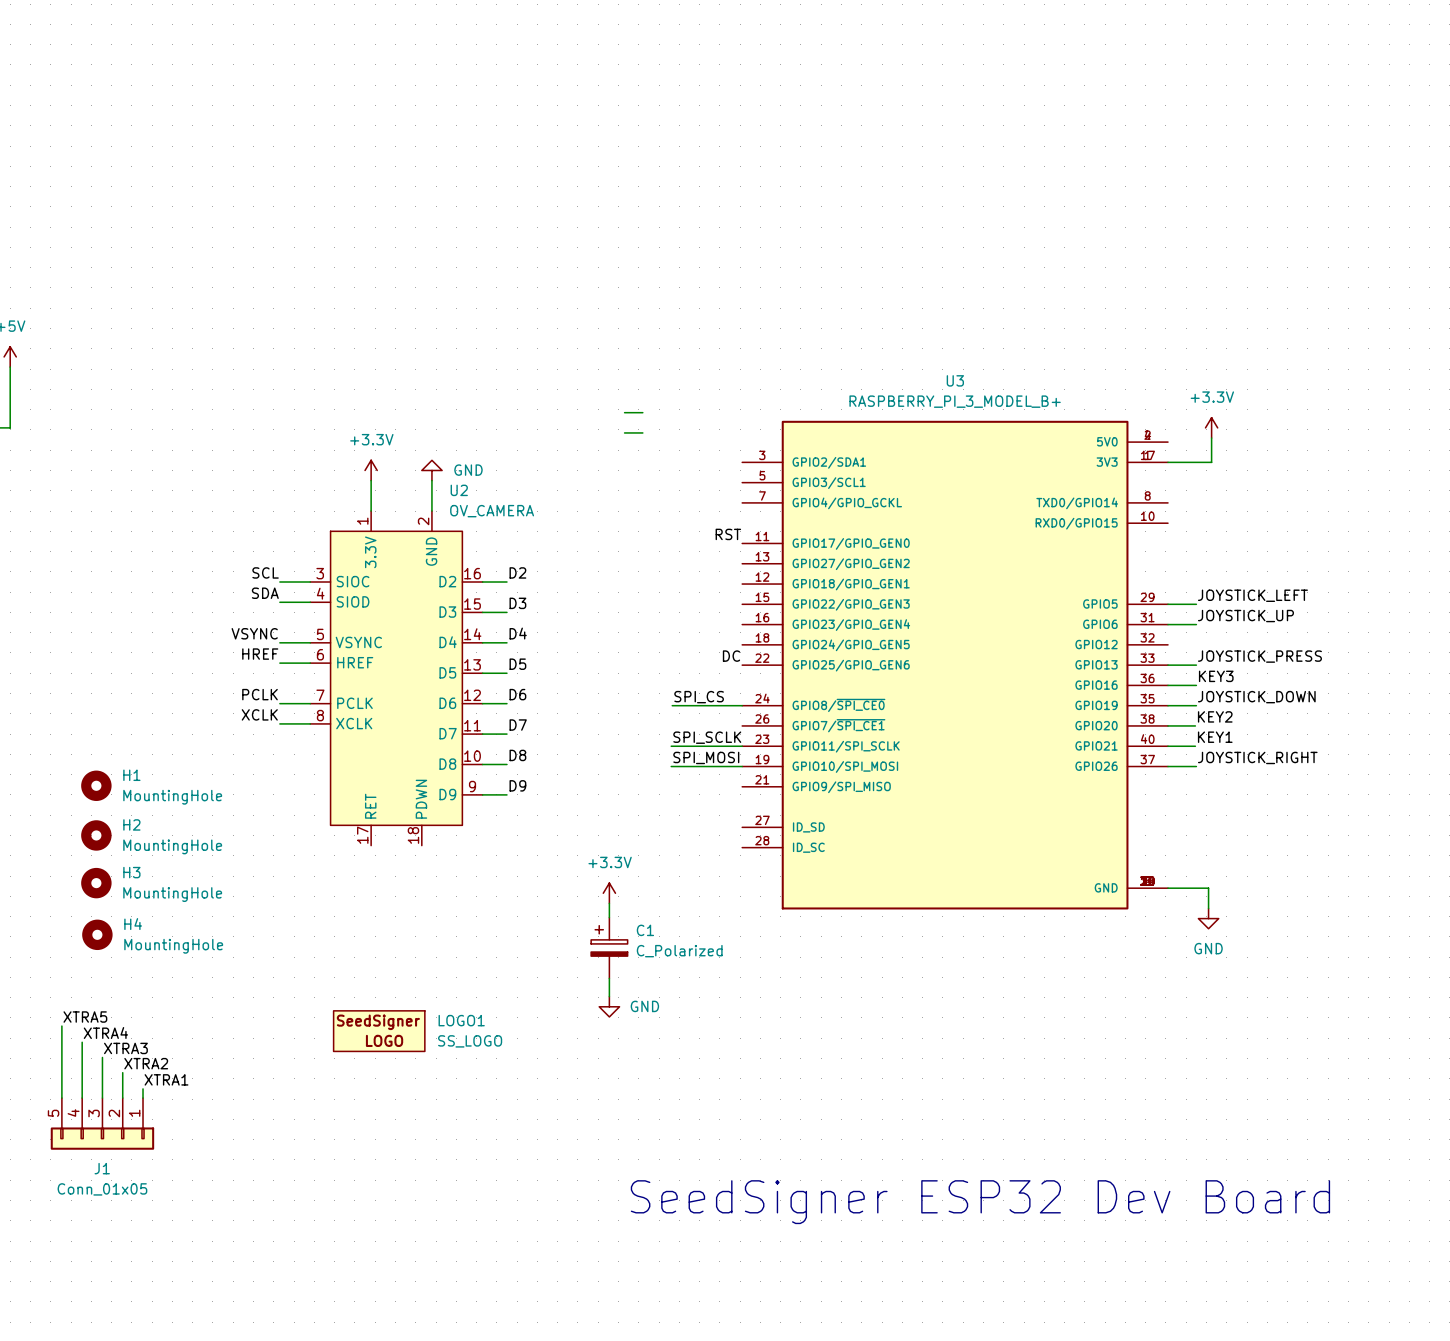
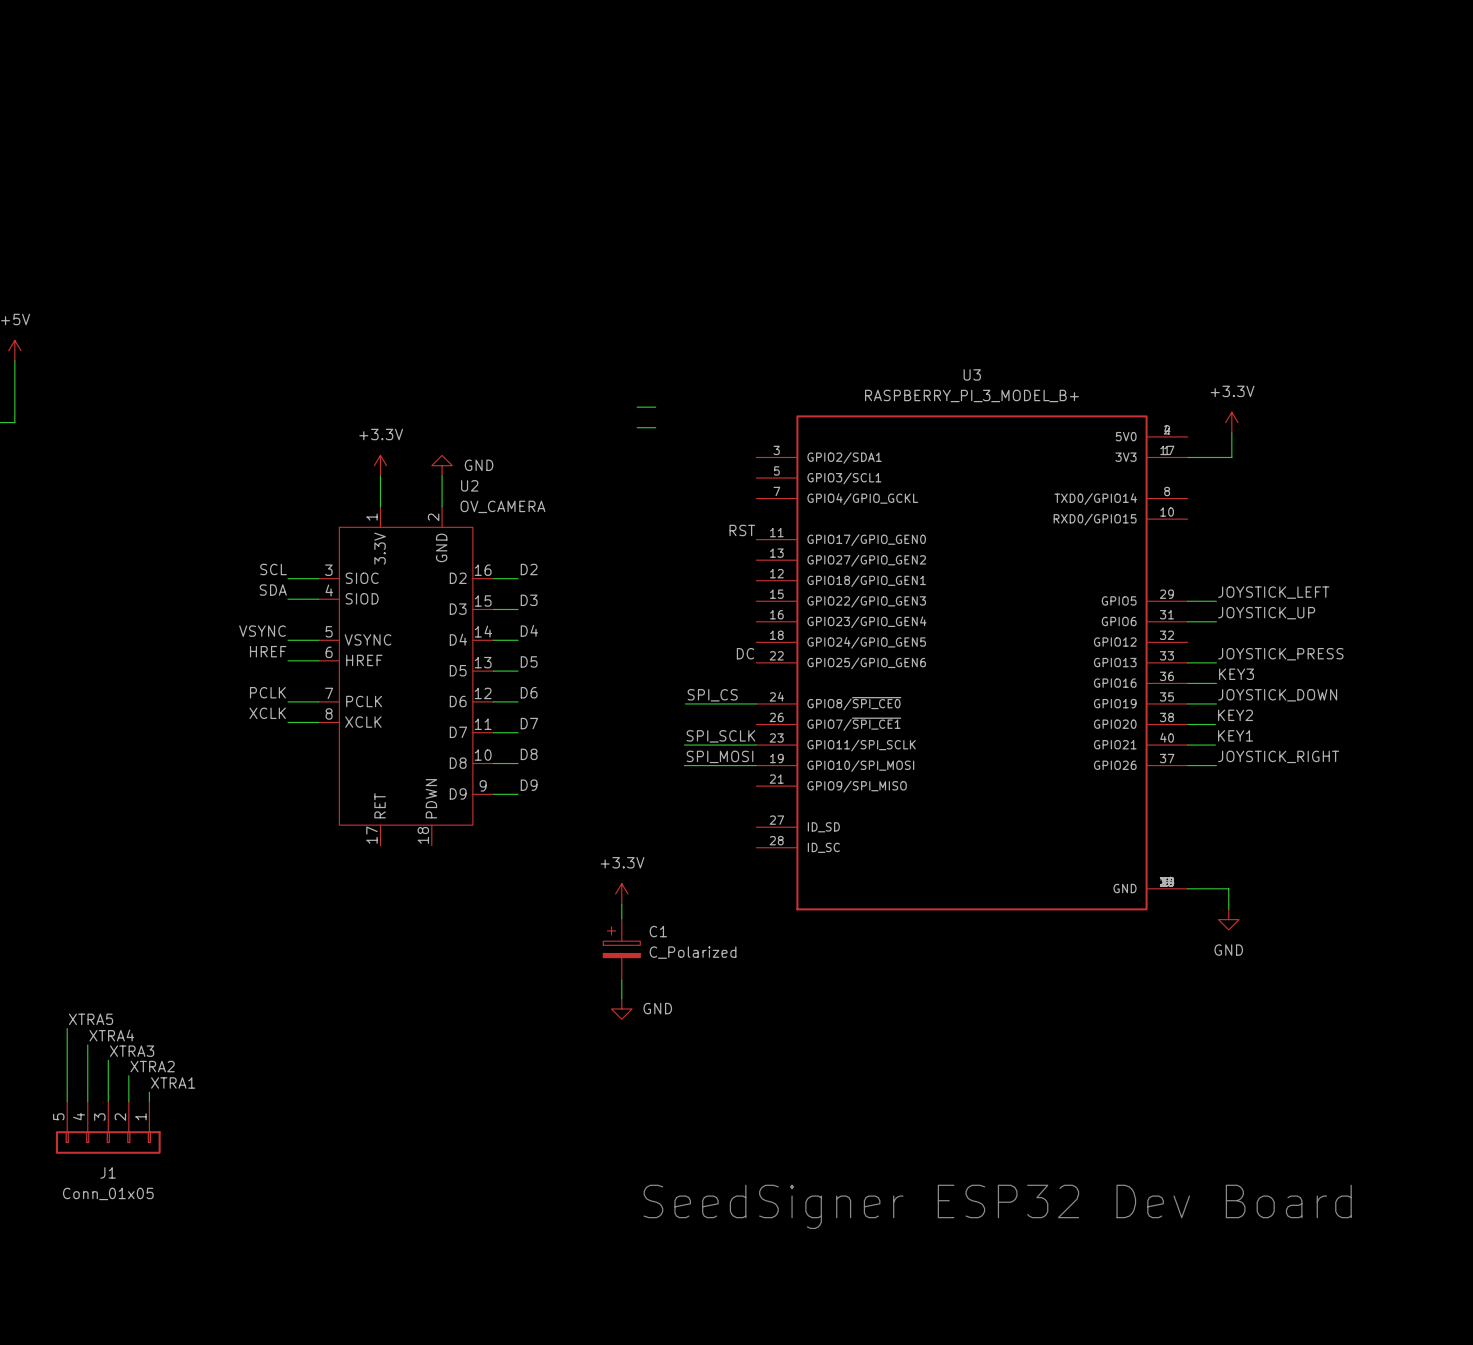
H1: MountingHole (96, 785) -> none
H2: MountingHole (96, 835) -> none
H3: MountingHole (96, 883) -> none
H4: MountingHole (97, 934) -> none
LOGO1: SS_LOGO (379, 1031) -> none

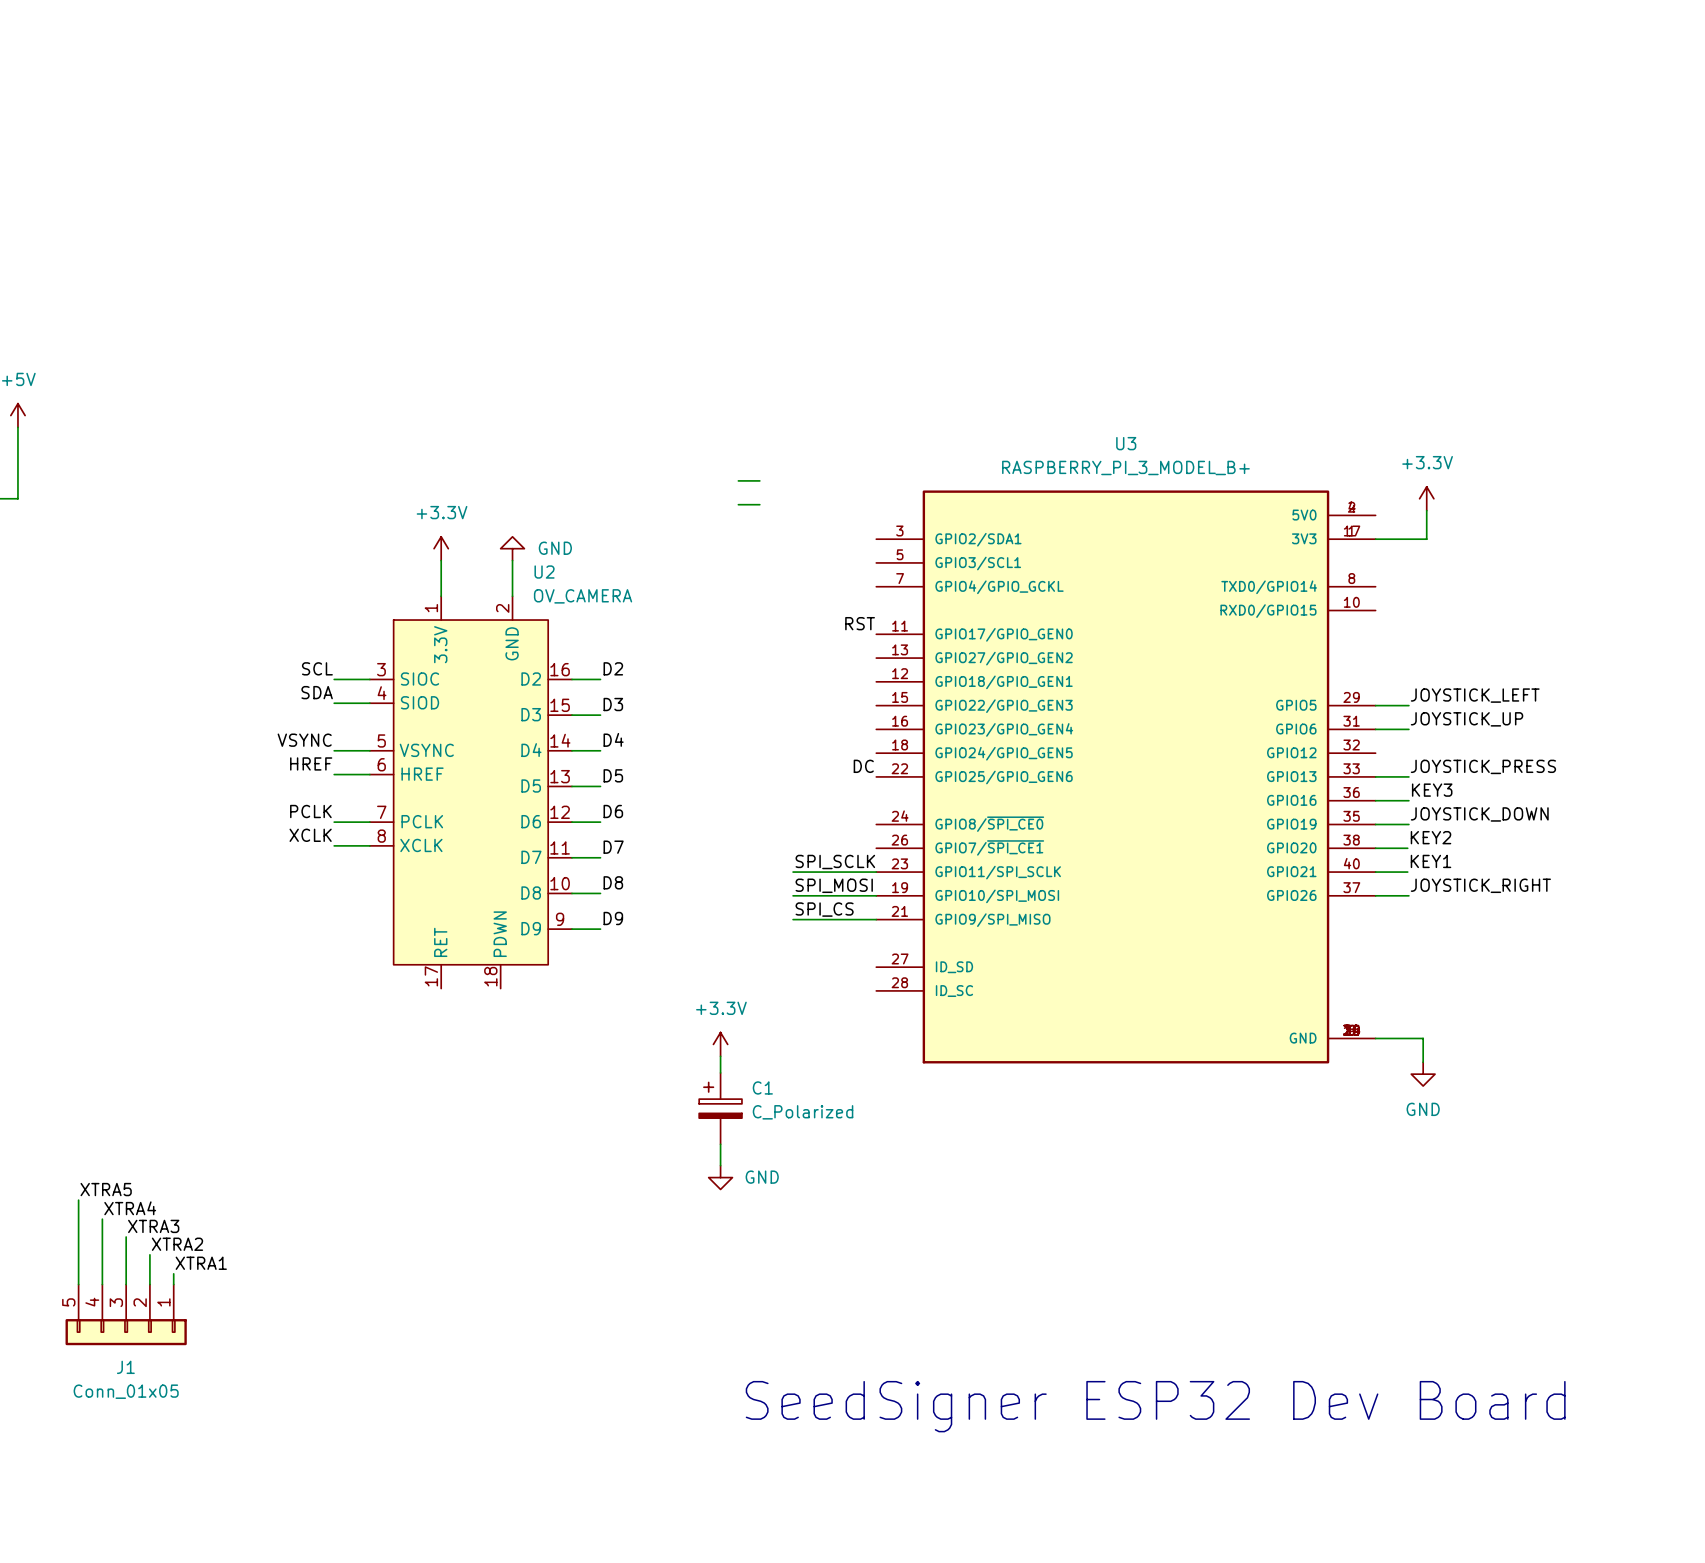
label position: SPI_CS (712, 695) -> SPI_CS (824, 909)
wire: (685, 703) (756, 703) -> none
wire: none -> (793, 919) (876, 919)

